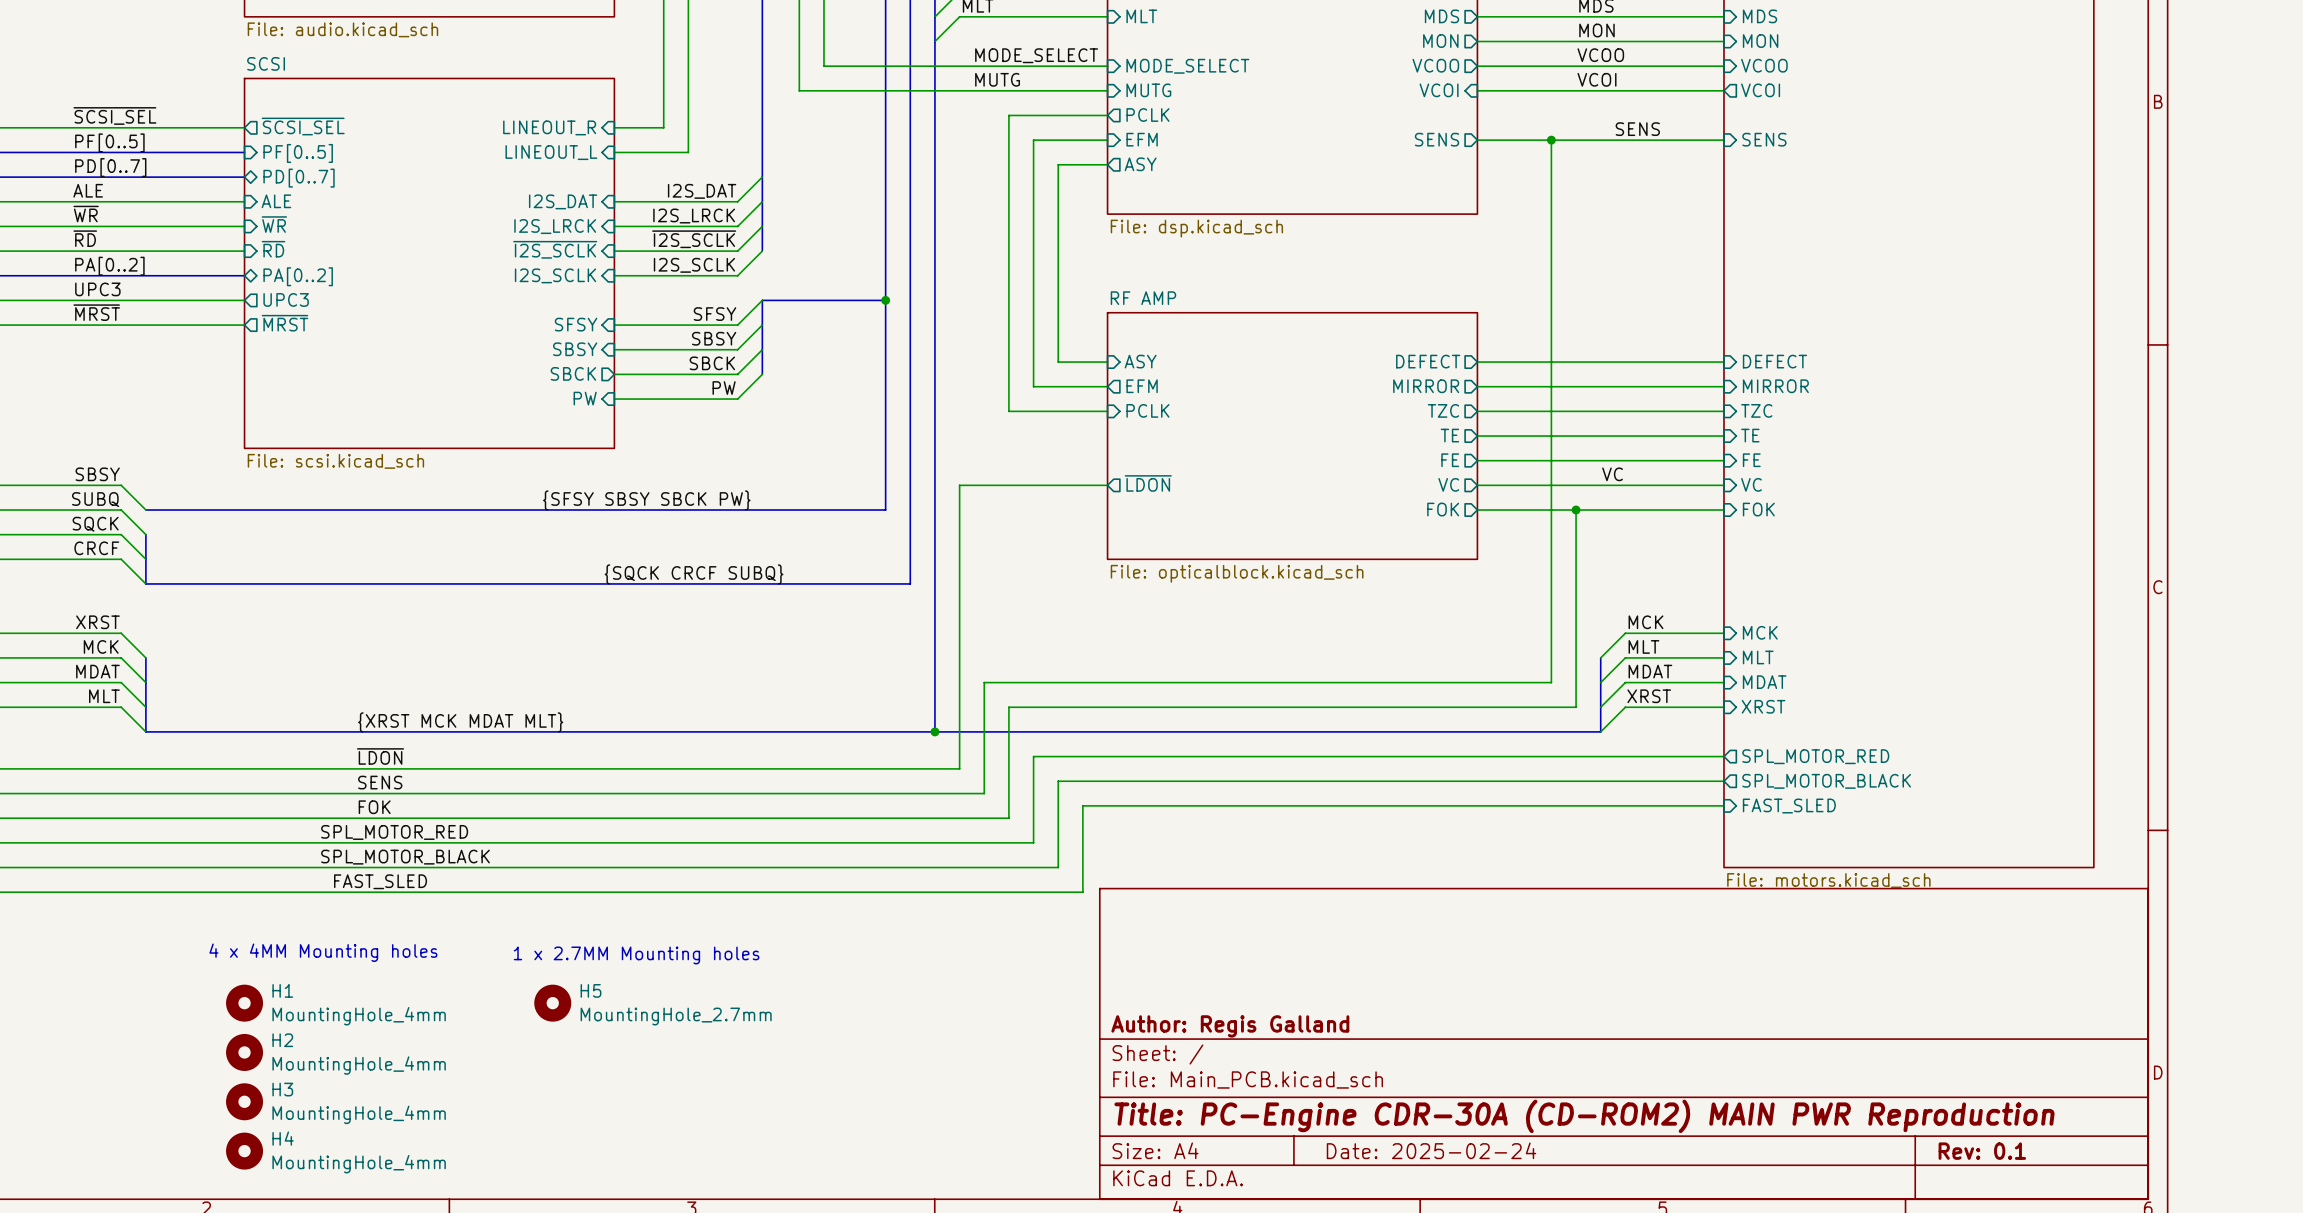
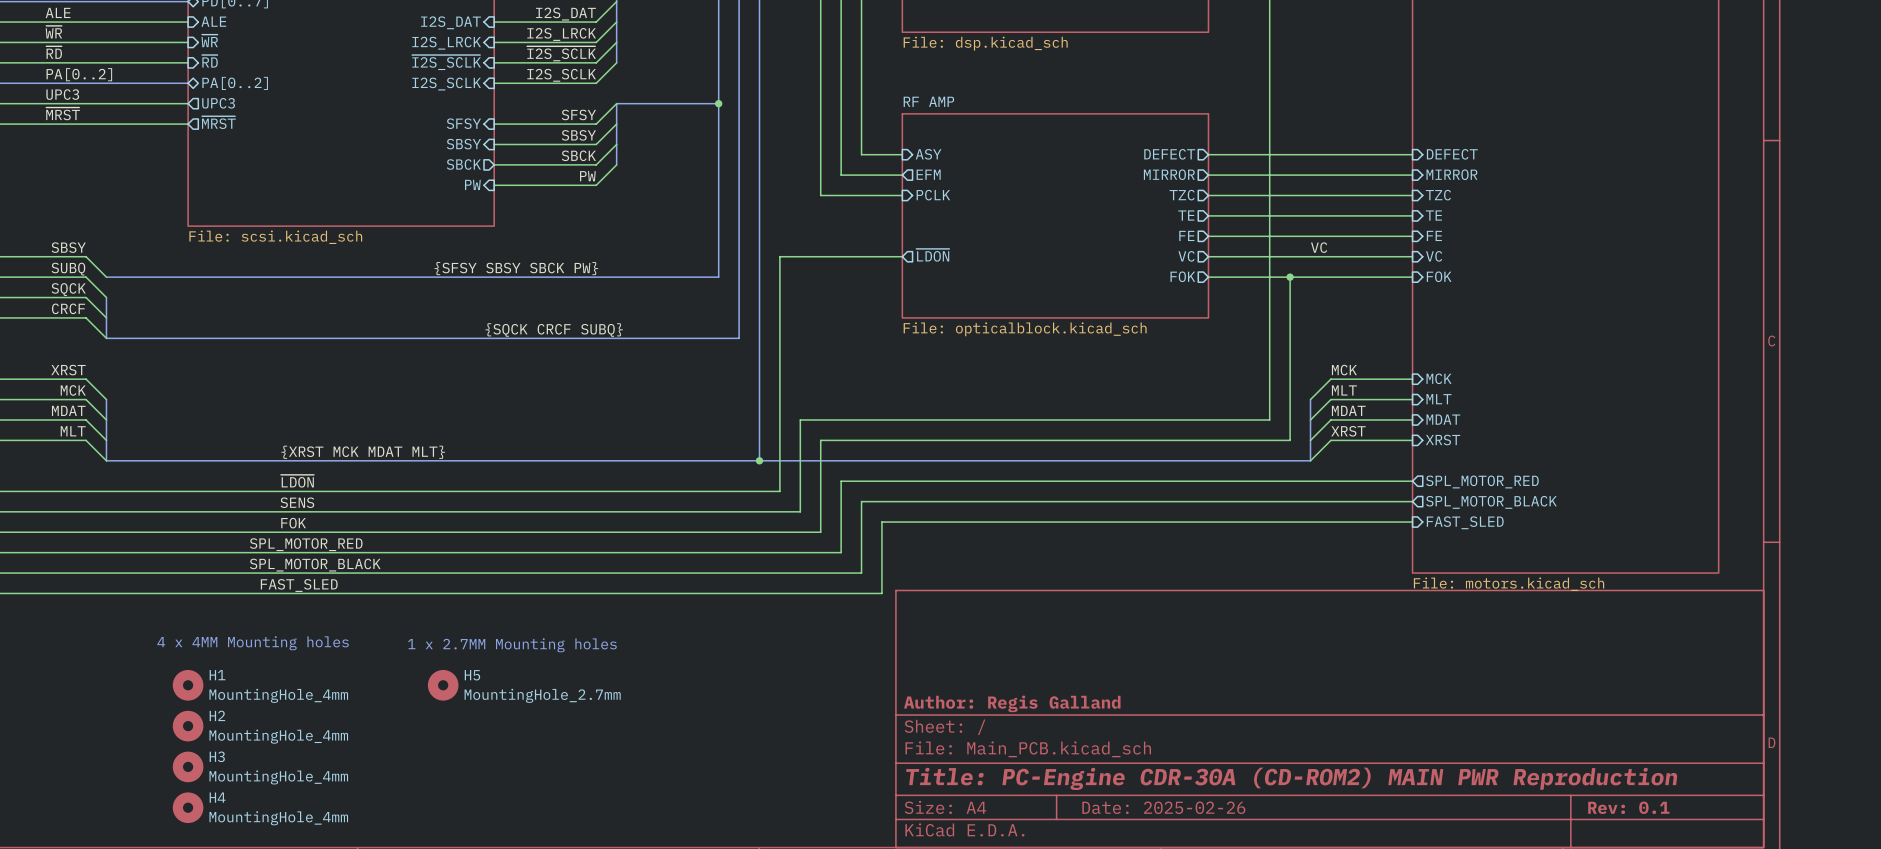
title block: Date: 2025-02-24 (1431, 1150) -> Date: 2025-02-26 (1163, 807)

